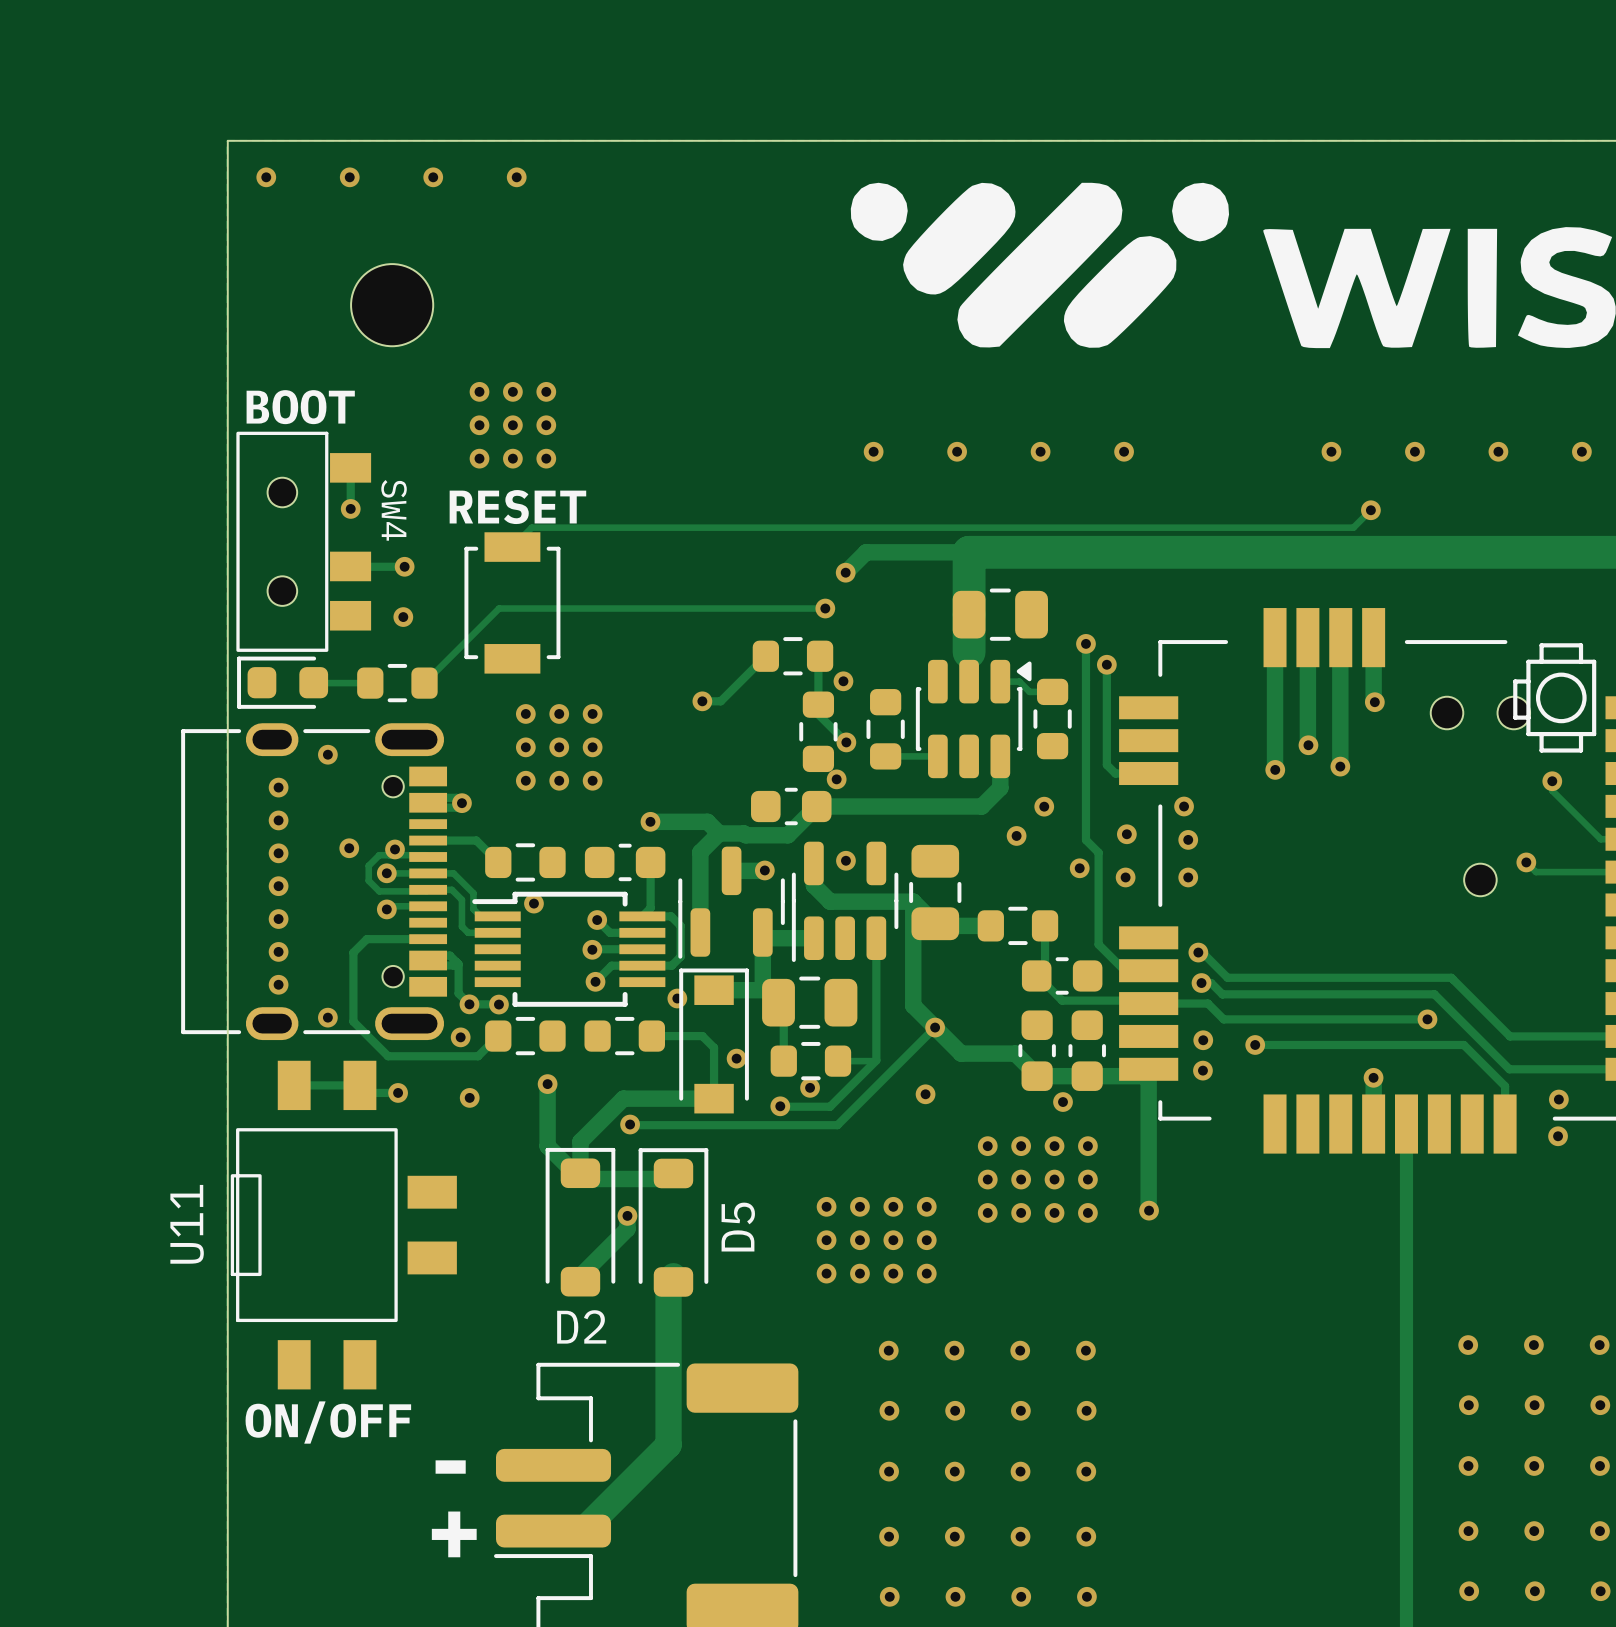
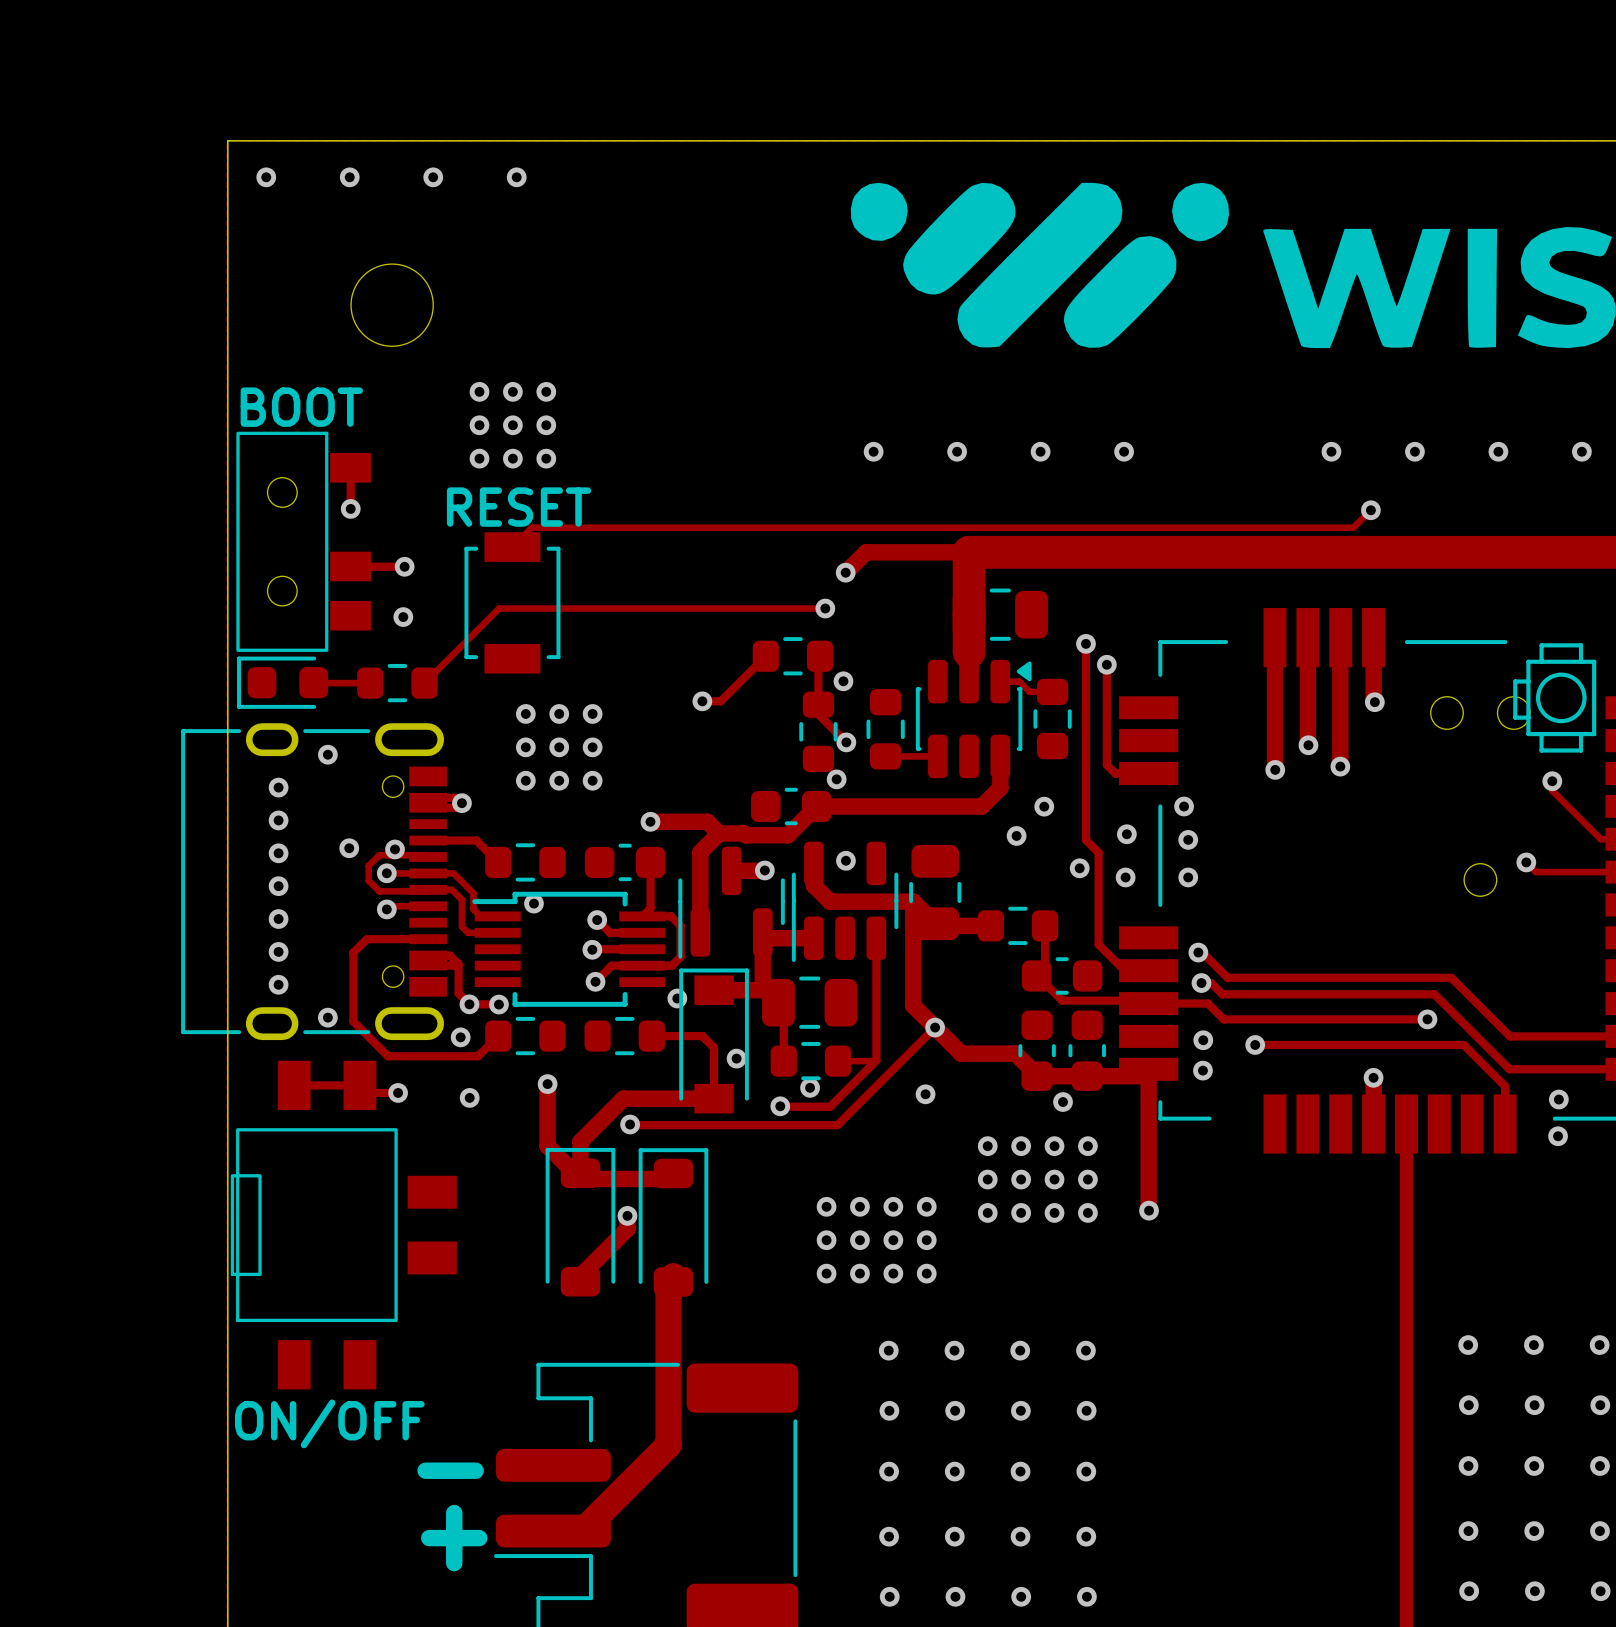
SW4 name: SW4 (394, 510) -> none
U11 name: U11 (187, 1224) -> none
D5 name: D5 (738, 1227) -> none
D2 name: D2 (581, 1326) -> none

